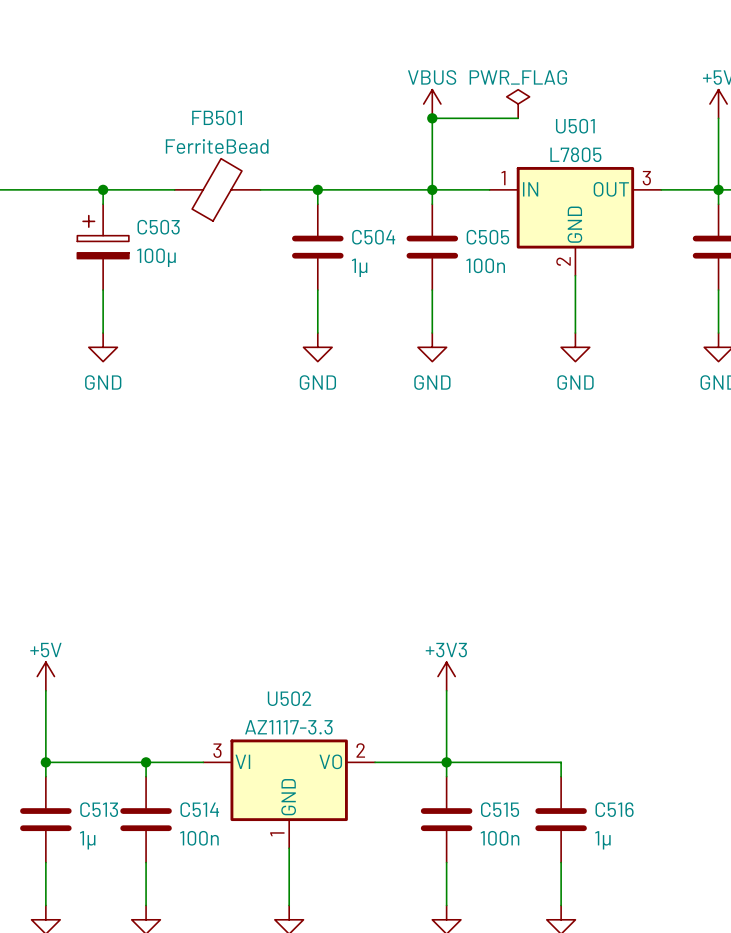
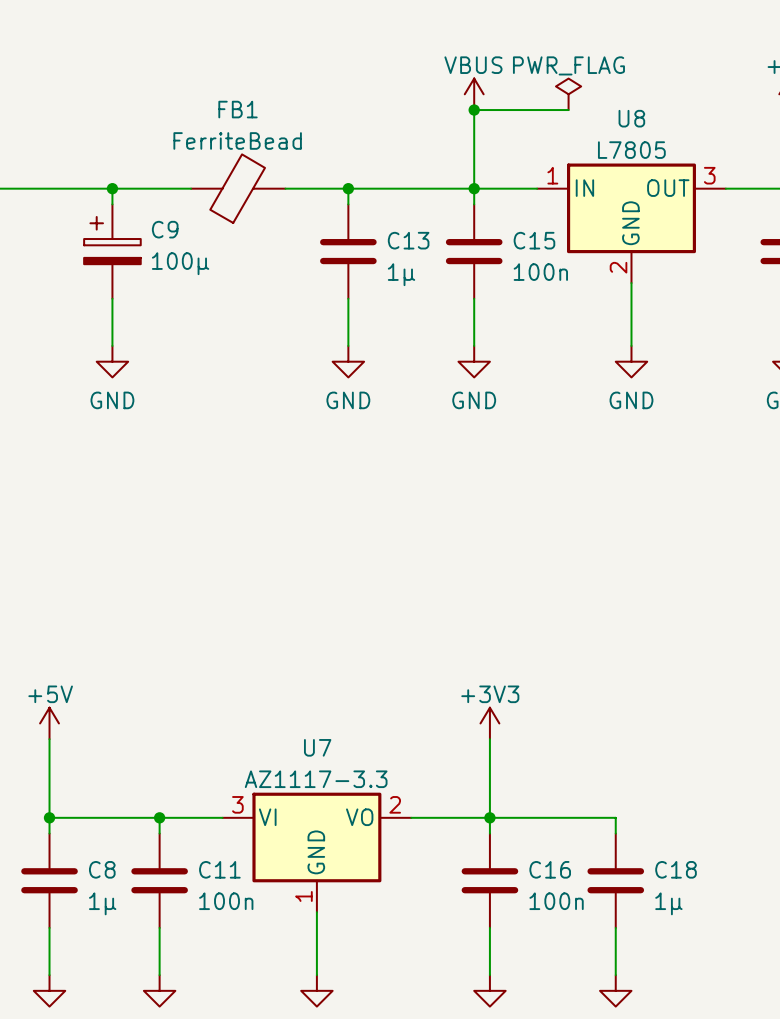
FB501 name: FB501 (217, 117) -> FB1 (238, 109)
U501 name: U501 (575, 126) -> U8 (631, 118)
C503 name: C503 (158, 227) -> C9 (165, 229)
C504 name: C504 (373, 237) -> C13 (408, 240)
C505 name: C505 (487, 237) -> C15 (534, 240)
U502 name: U502 (289, 698) -> U7 (317, 747)
C513 name: C513 (99, 809) -> C8 (102, 869)
C514 name: C514 (199, 809) -> C11 (219, 869)
C515 name: C515 (500, 809) -> C16 (550, 869)
C516 name: C516 (614, 809) -> C18 (676, 869)

